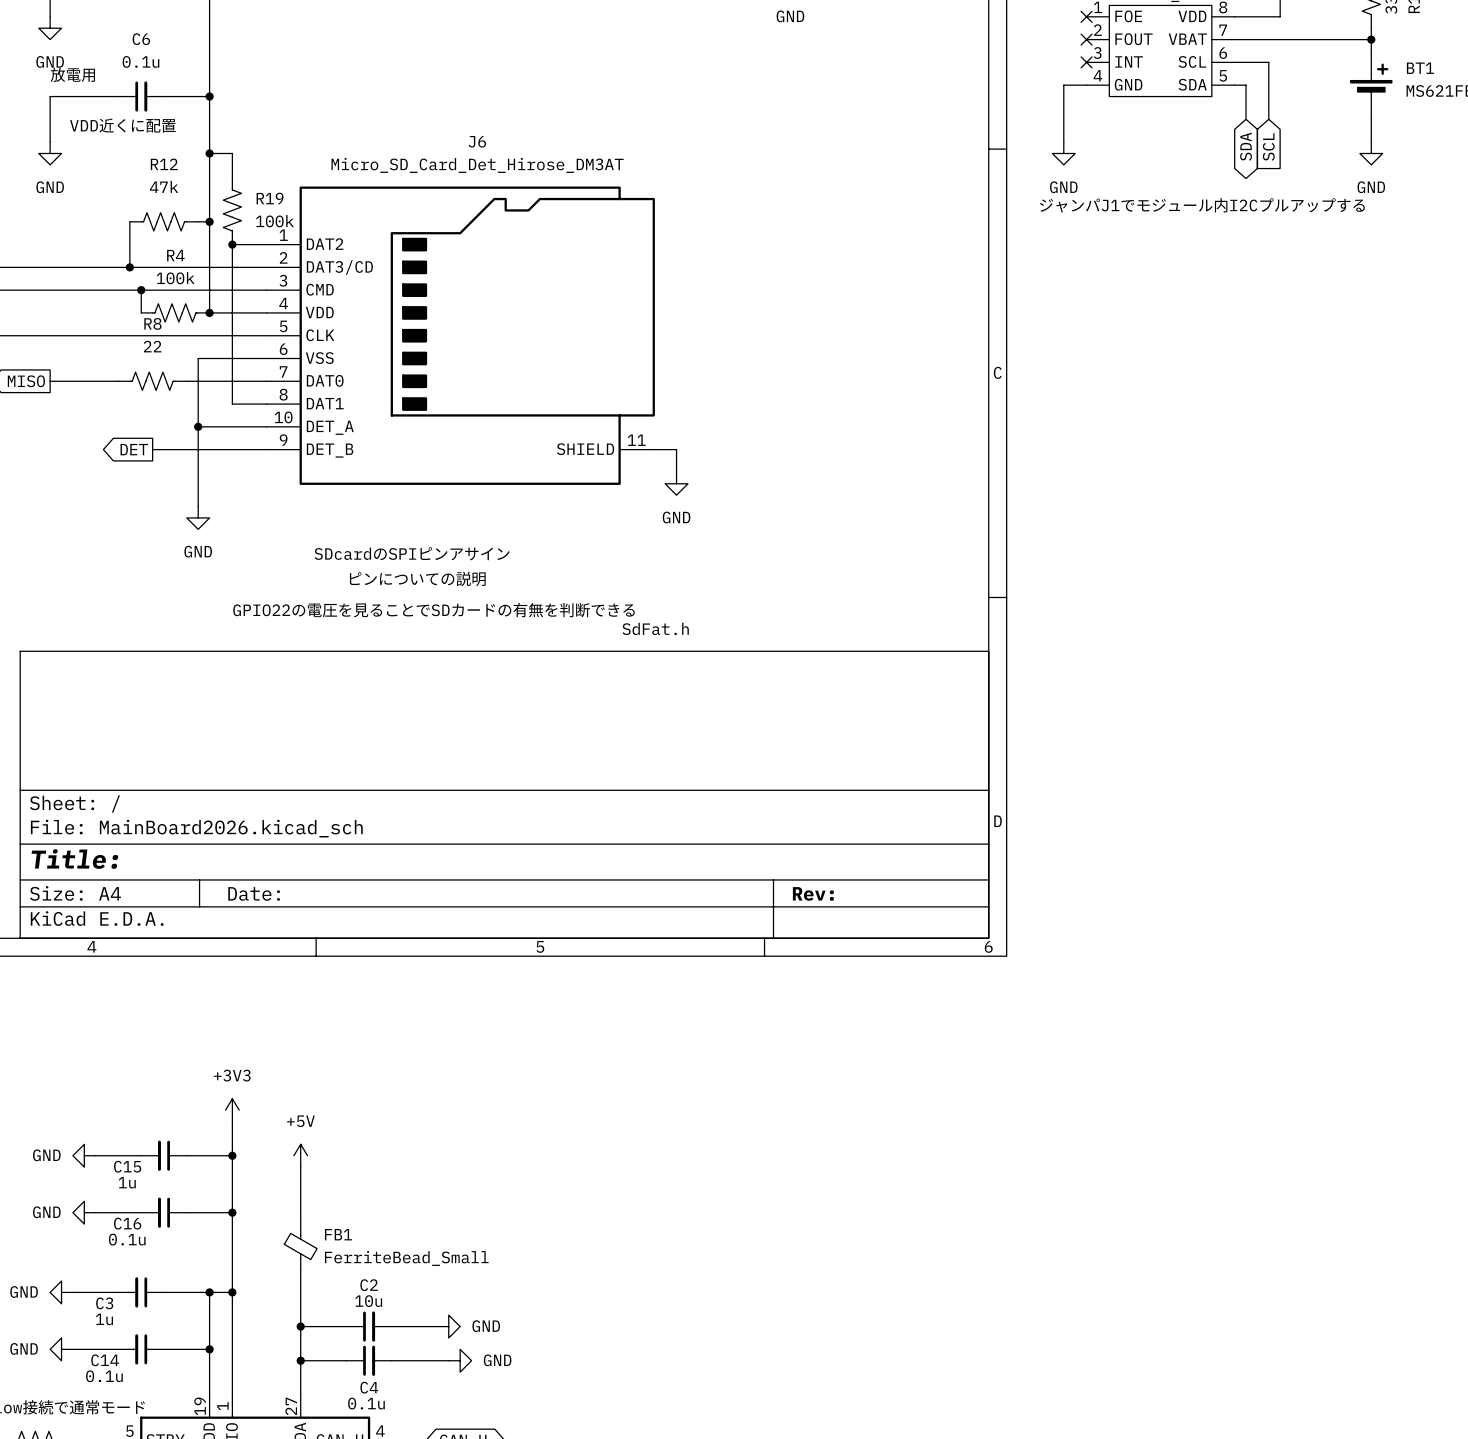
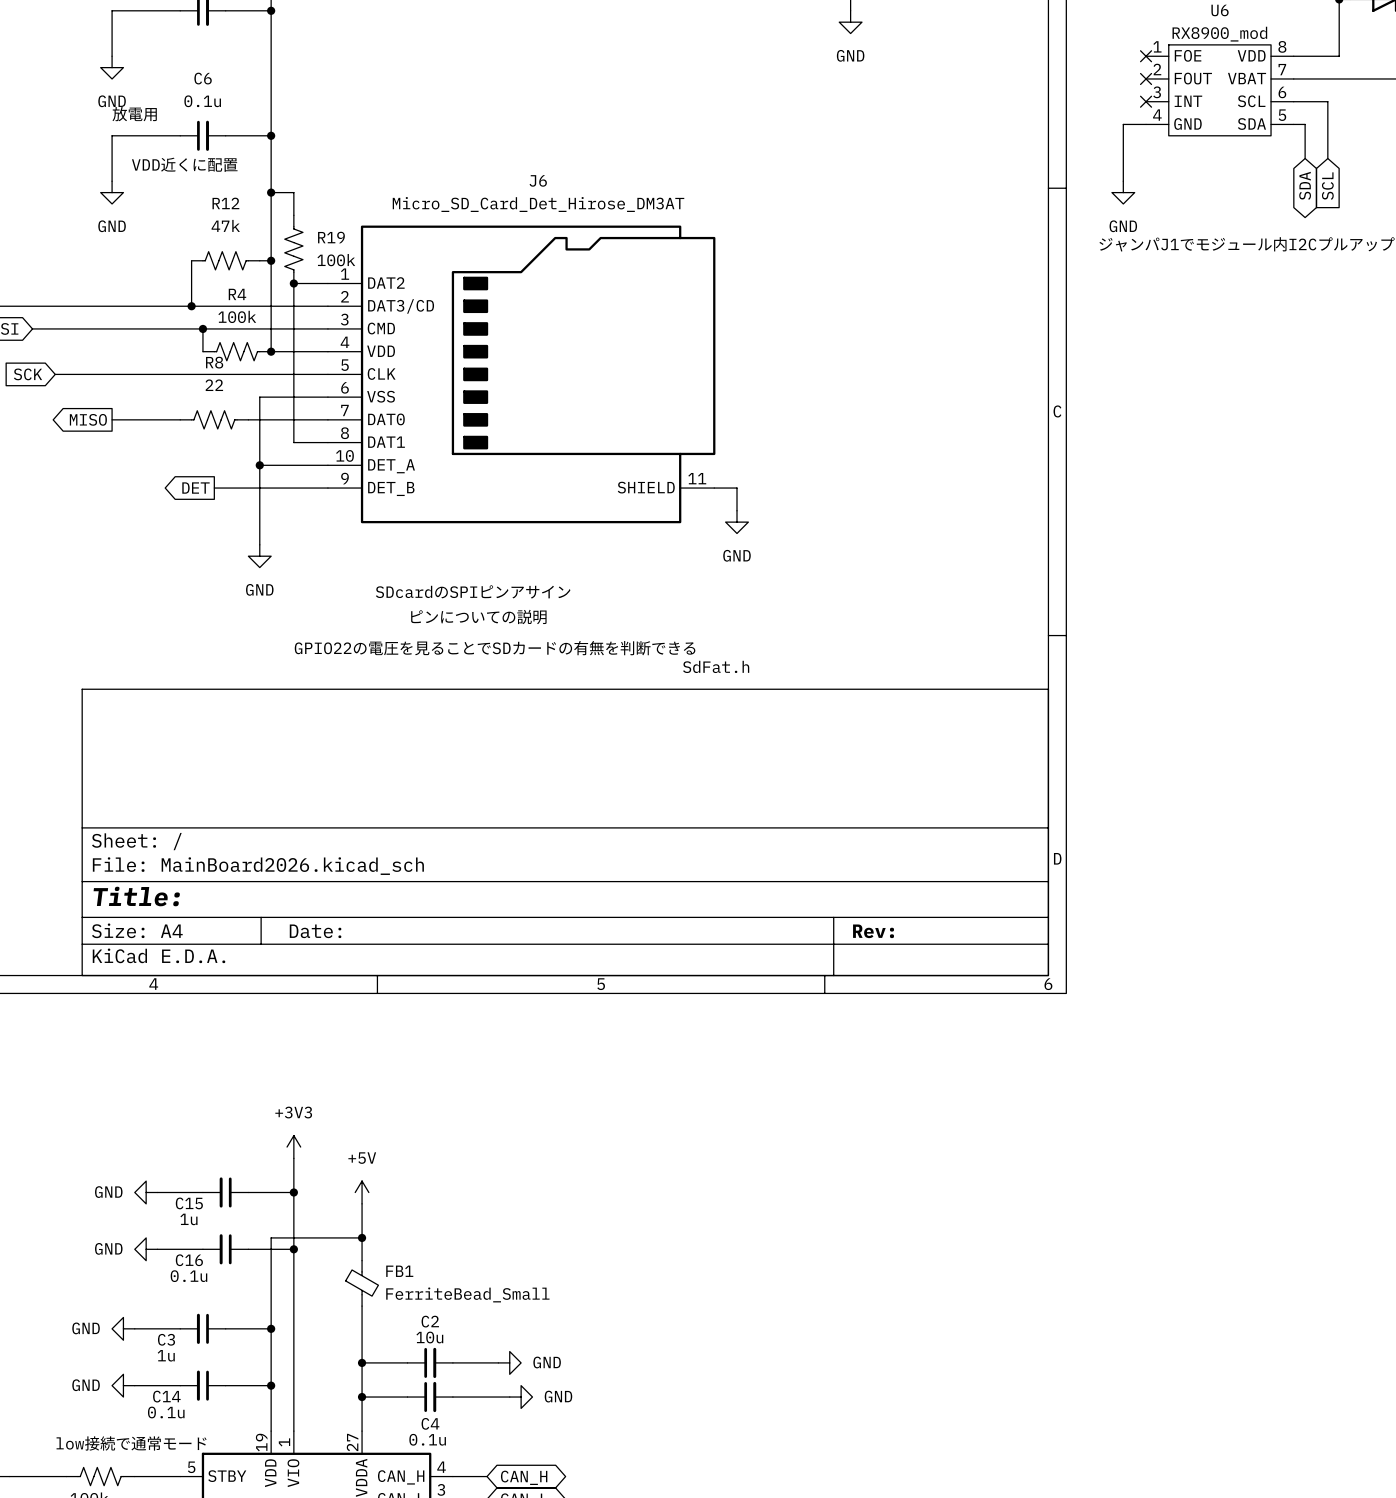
junction: none -> (362, 1237)
wire: (209, 1292) (232, 1292) -> (271, 1328) (271, 1237) (362, 1237)
junction: (232, 1292) -> none

